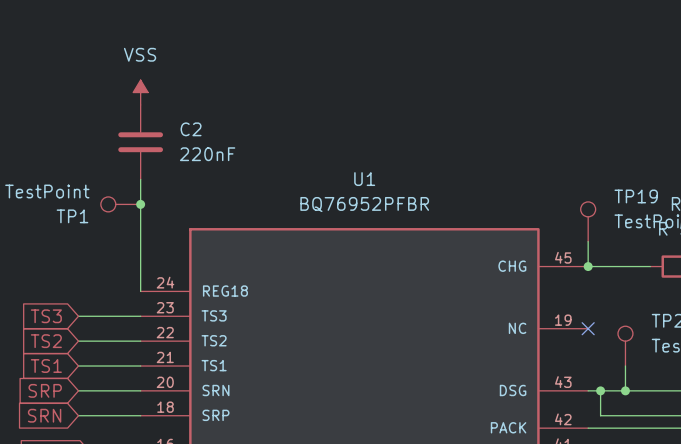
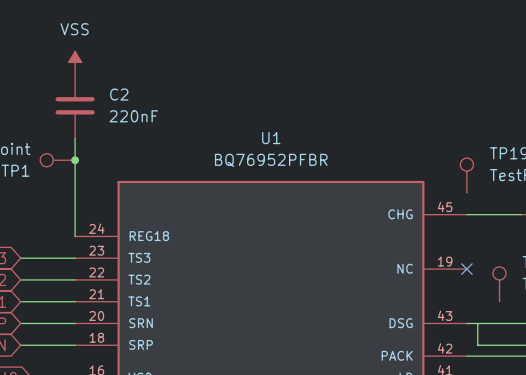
wire: (588, 241) (588, 266) -> none
junction: (588, 266) -> none
wire: (625, 366) (625, 390) -> none
junction: (600, 390) -> none
junction: (625, 390) -> none

